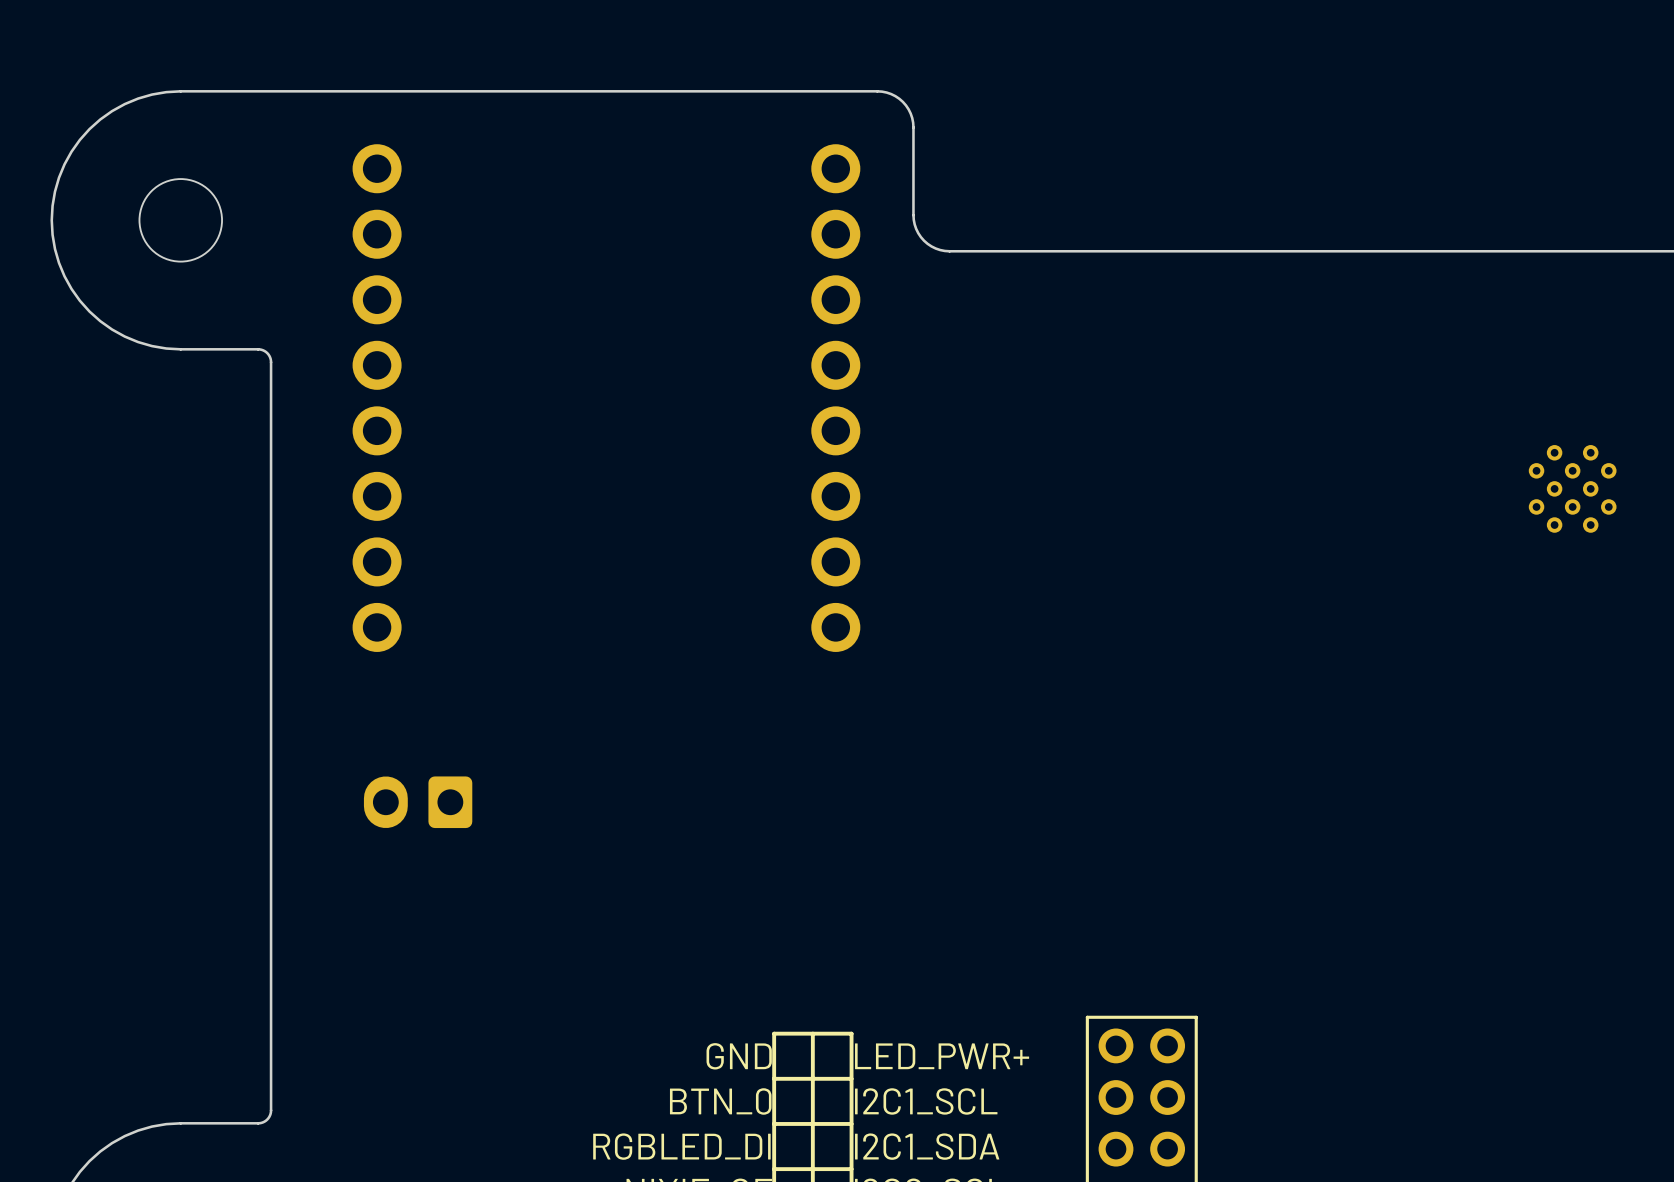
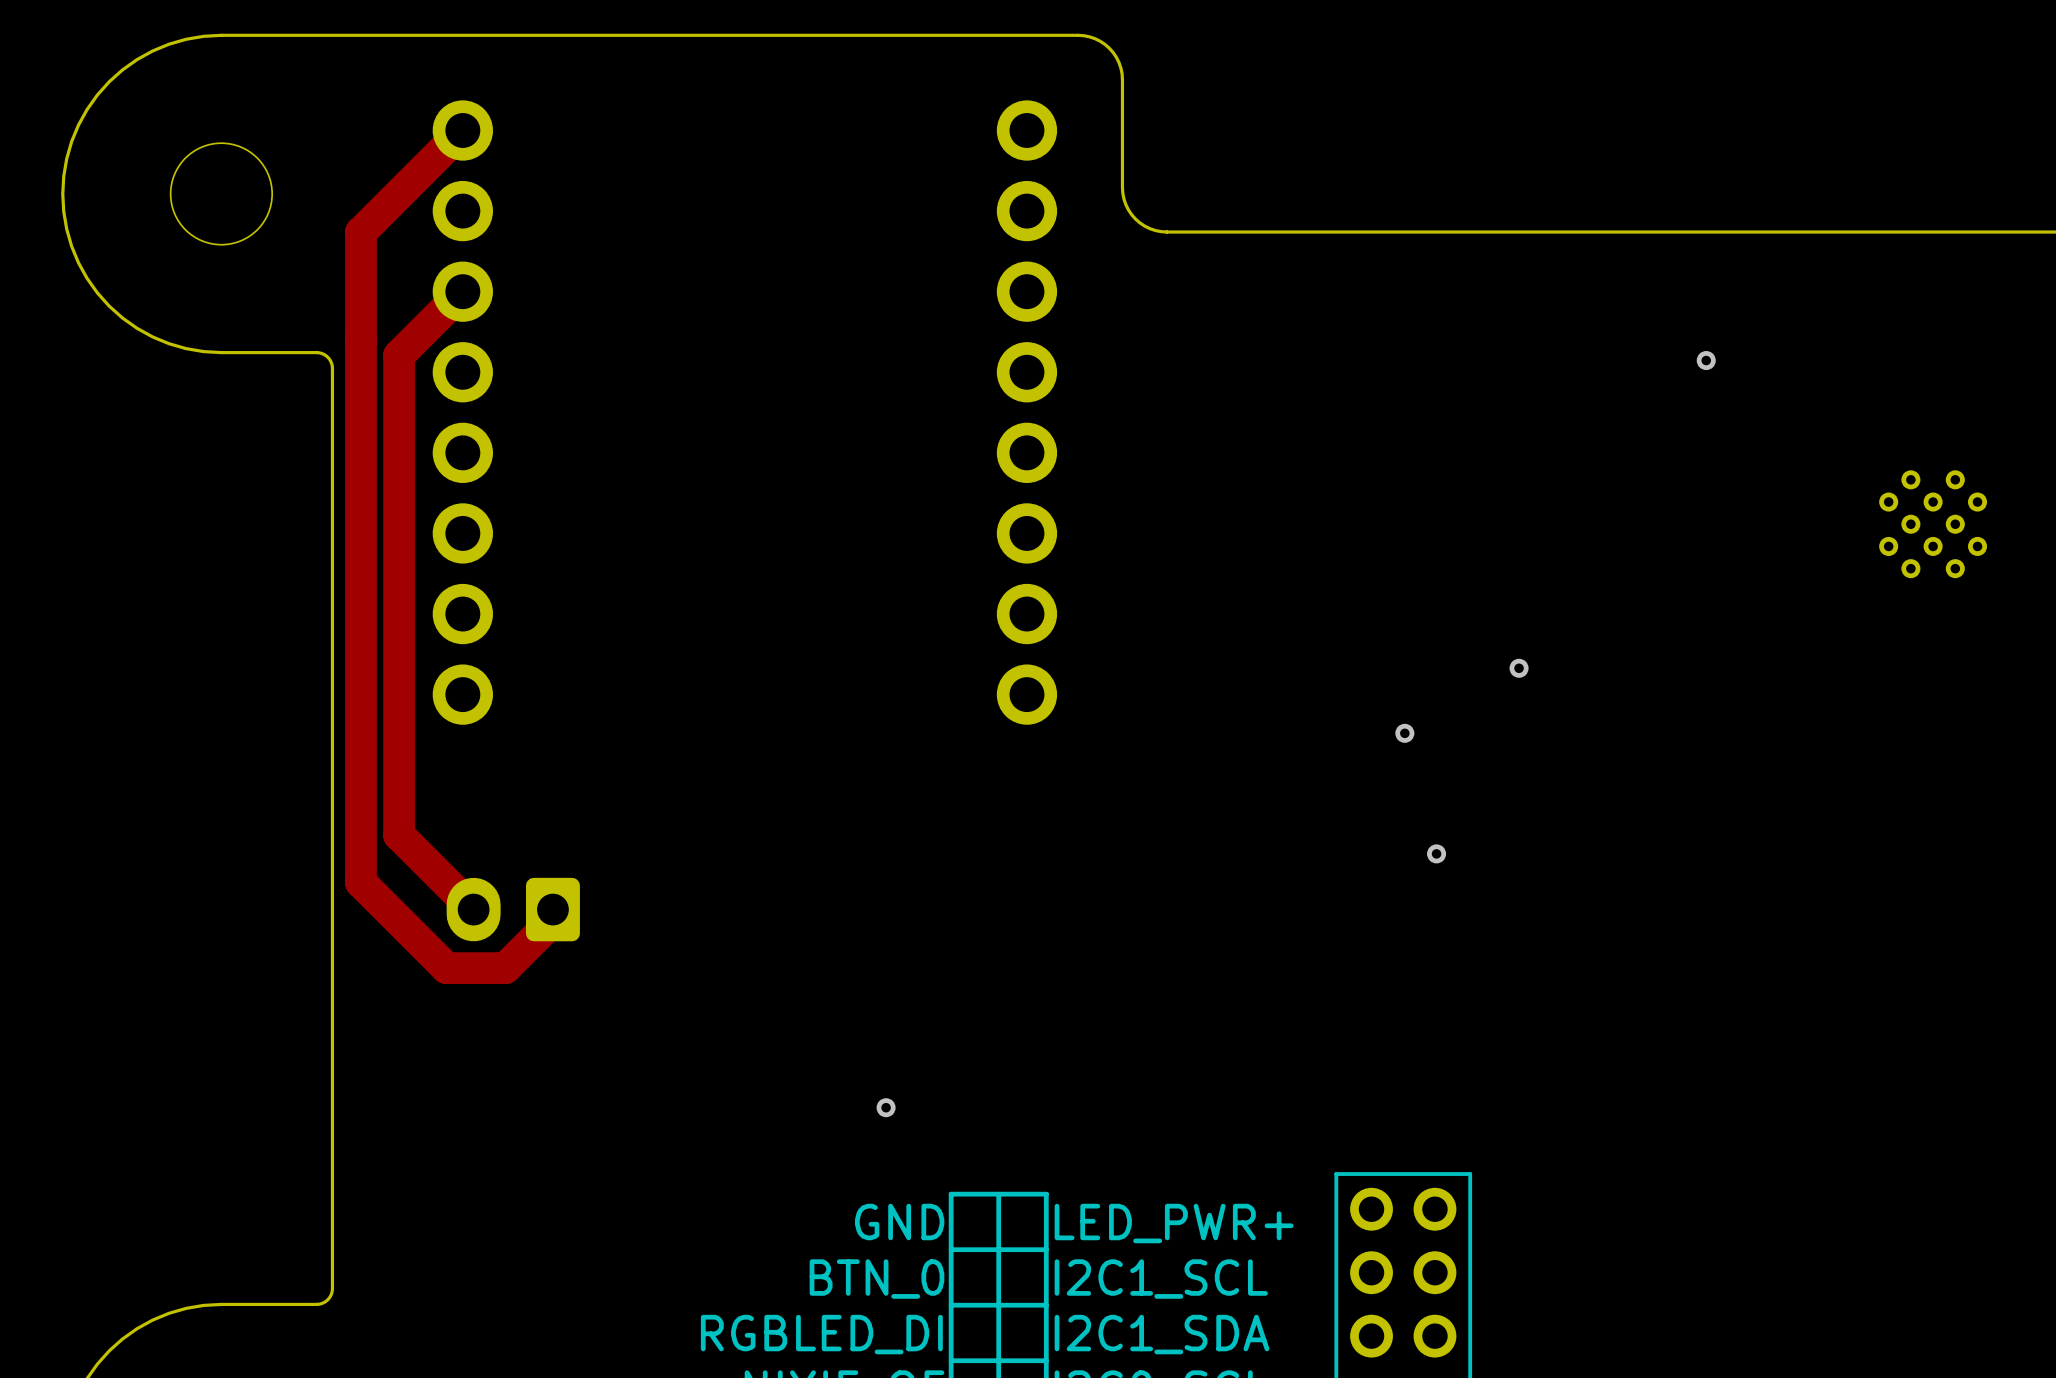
track: none -> (462, 130) (361, 232) (360, 882) (446, 968) (505, 968) (552, 920) (552, 909)
track: none -> (462, 291) (399, 355) (399, 835) (473, 909)
via: none -> (1706, 360)
via: none -> (1519, 668)
via: none -> (1404, 733)
via: none -> (1436, 853)
via: none -> (886, 1107)

